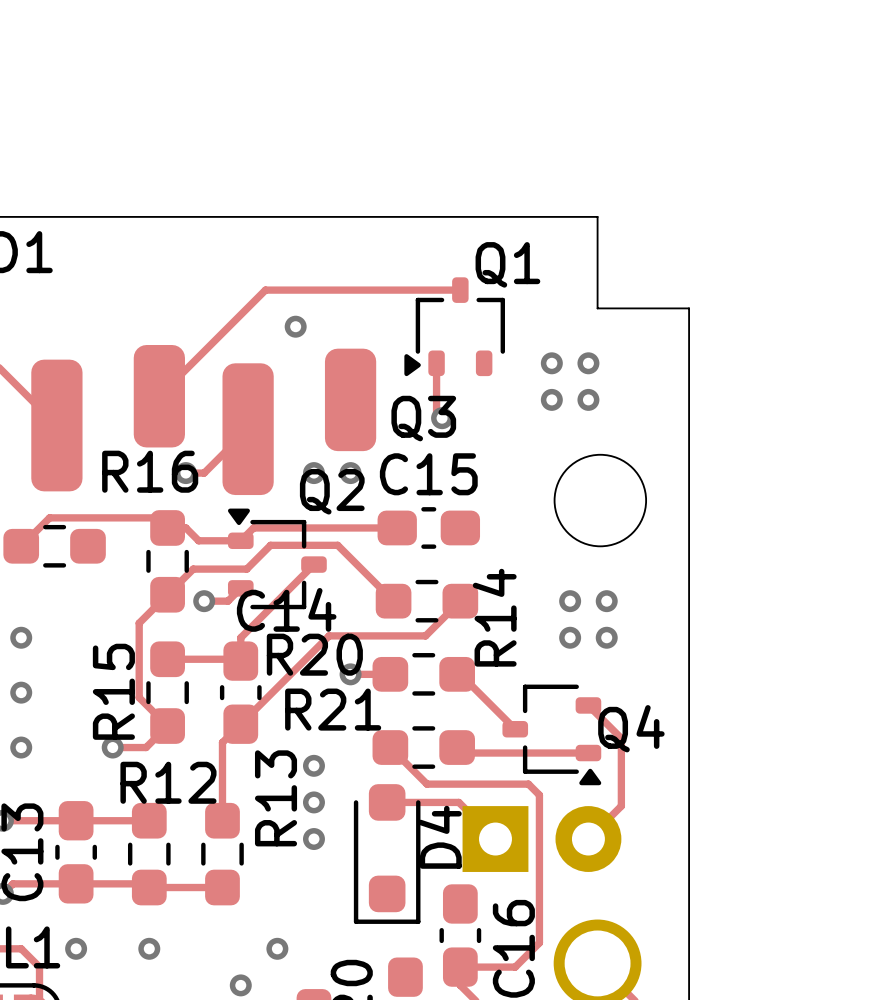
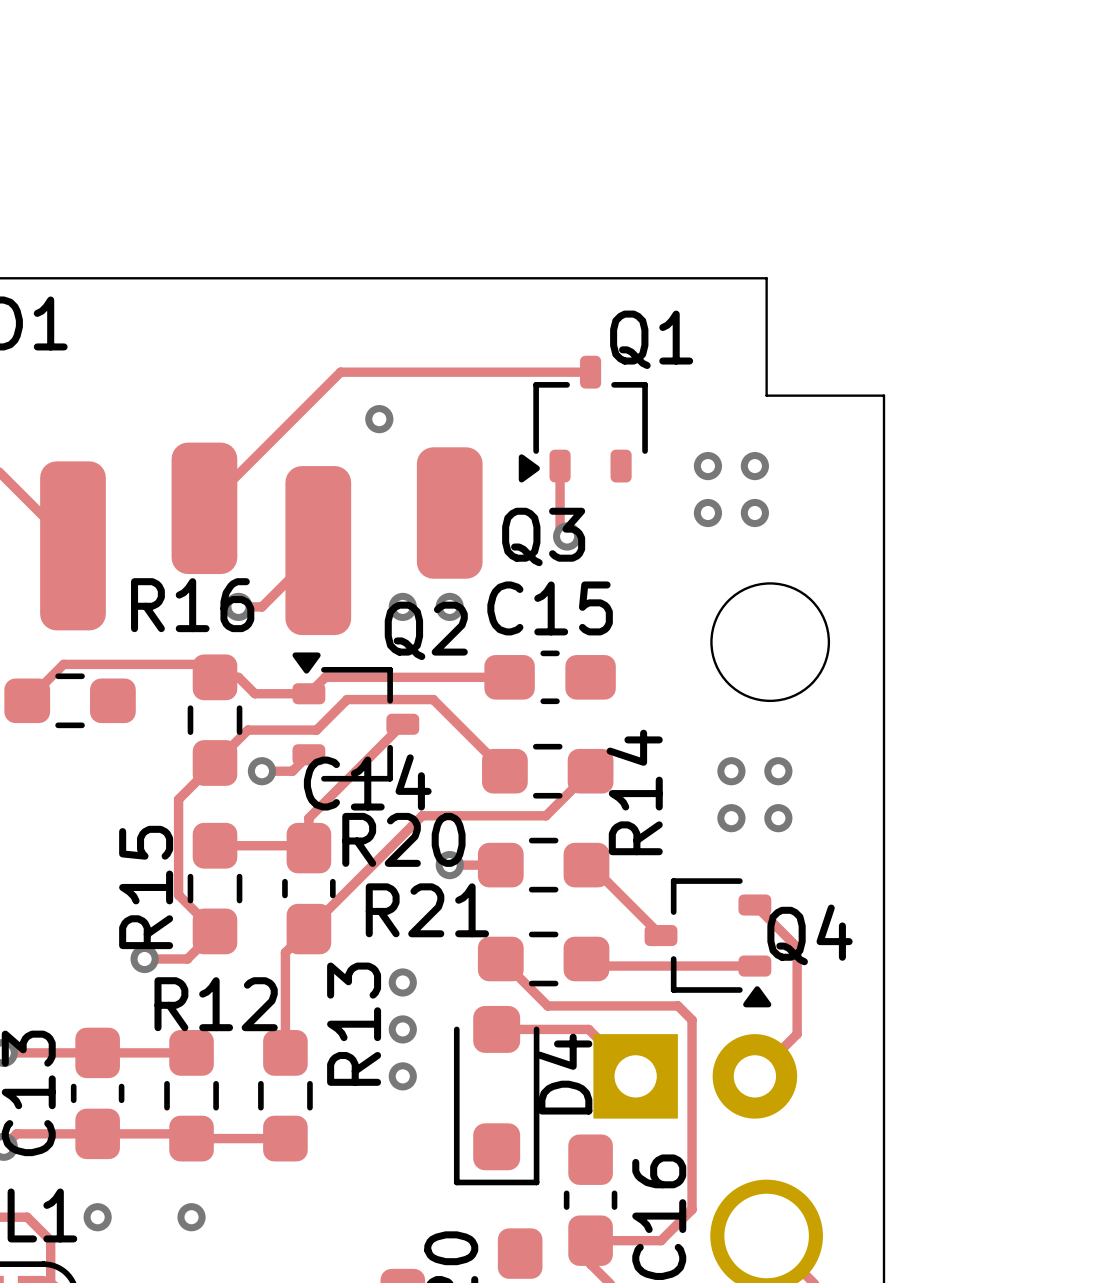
via: (21, 637) -> none
via: (21, 692) -> none
via: (21, 747) -> none
via: (277, 948) -> none
via: (240, 985) -> none

